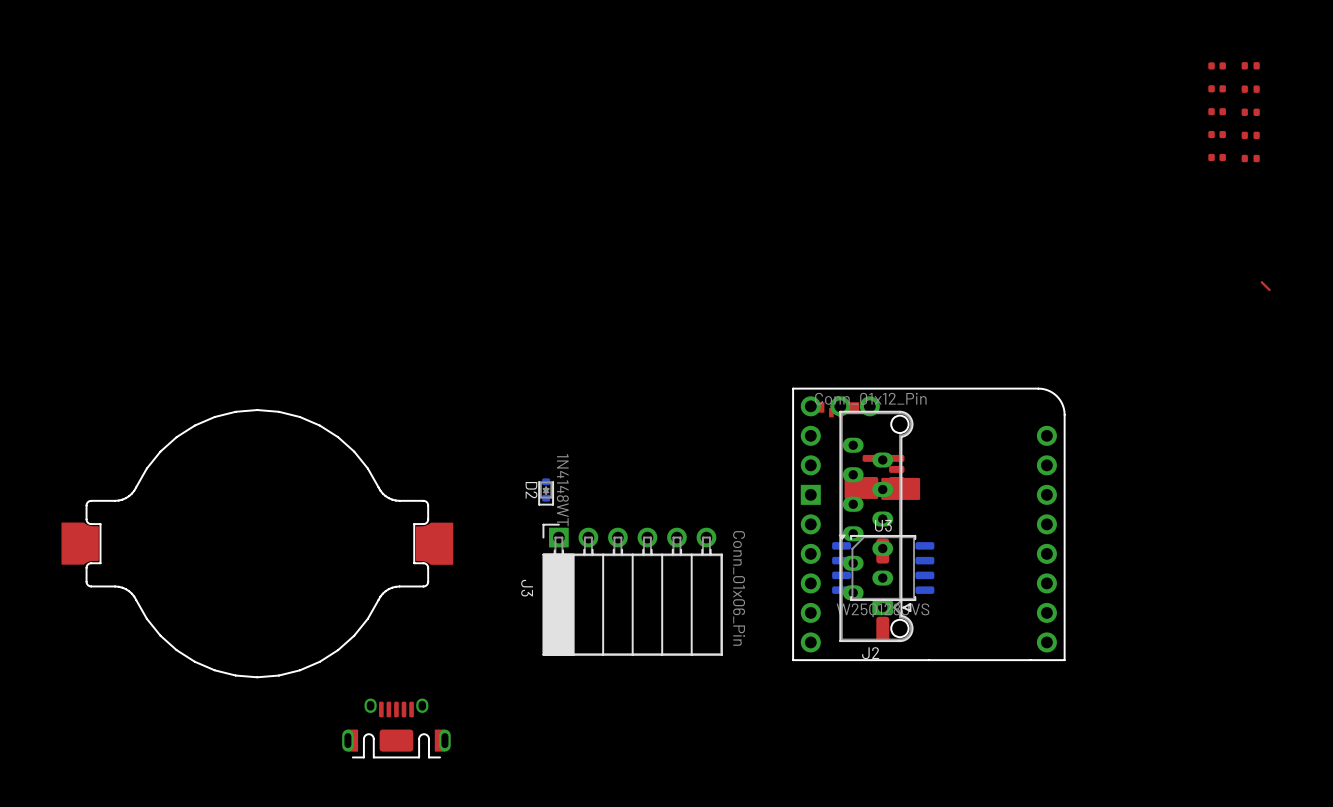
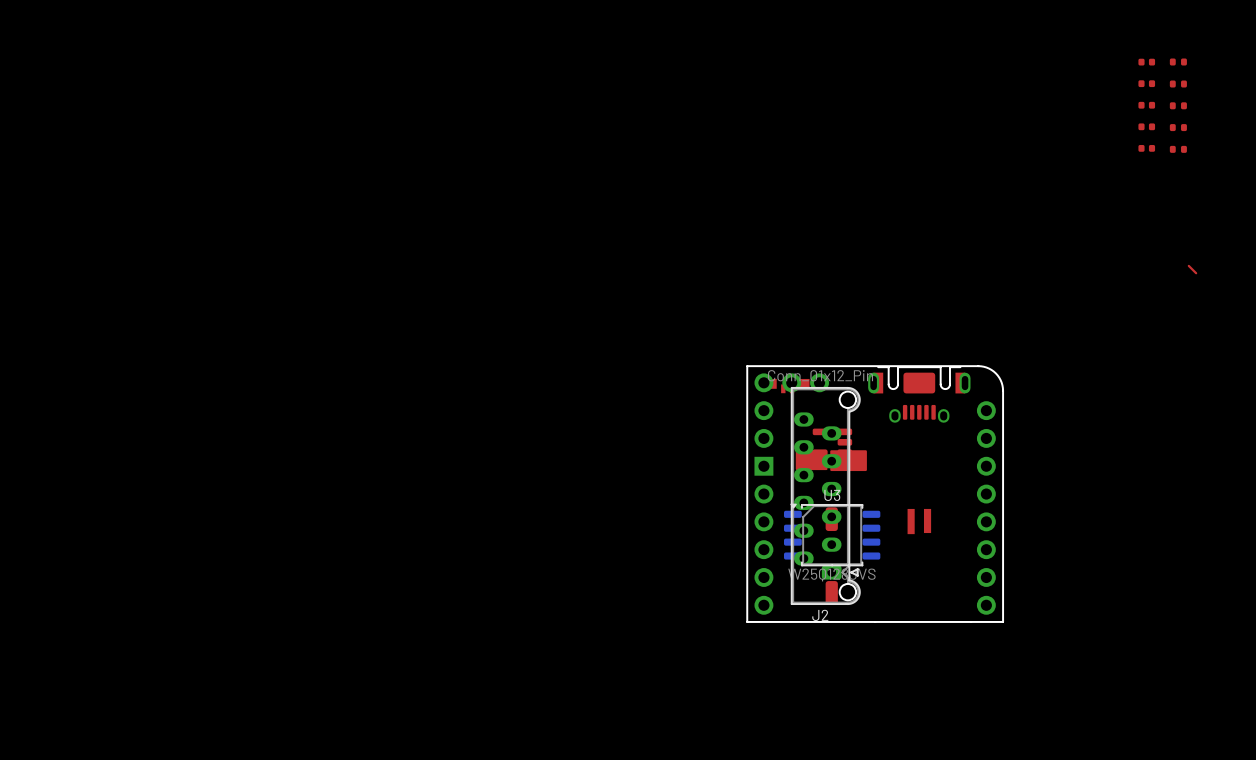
part: none -> (919, 394)
D2: 1N4148WT (546, 491) -> none
part: (257, 543) -> none
part: none -> (919, 521)
J3: Conn_01x06_Pin (632, 589) -> none
part: (396, 728) -> none

